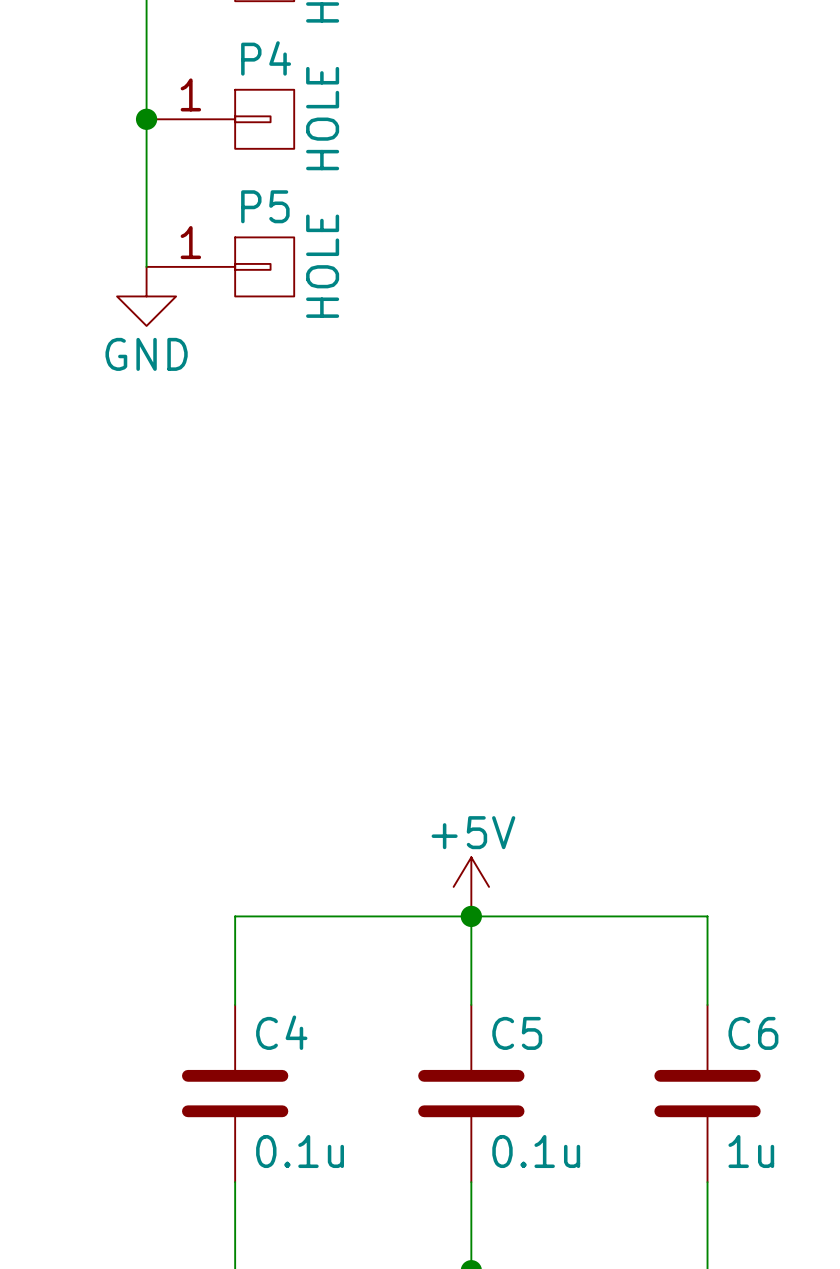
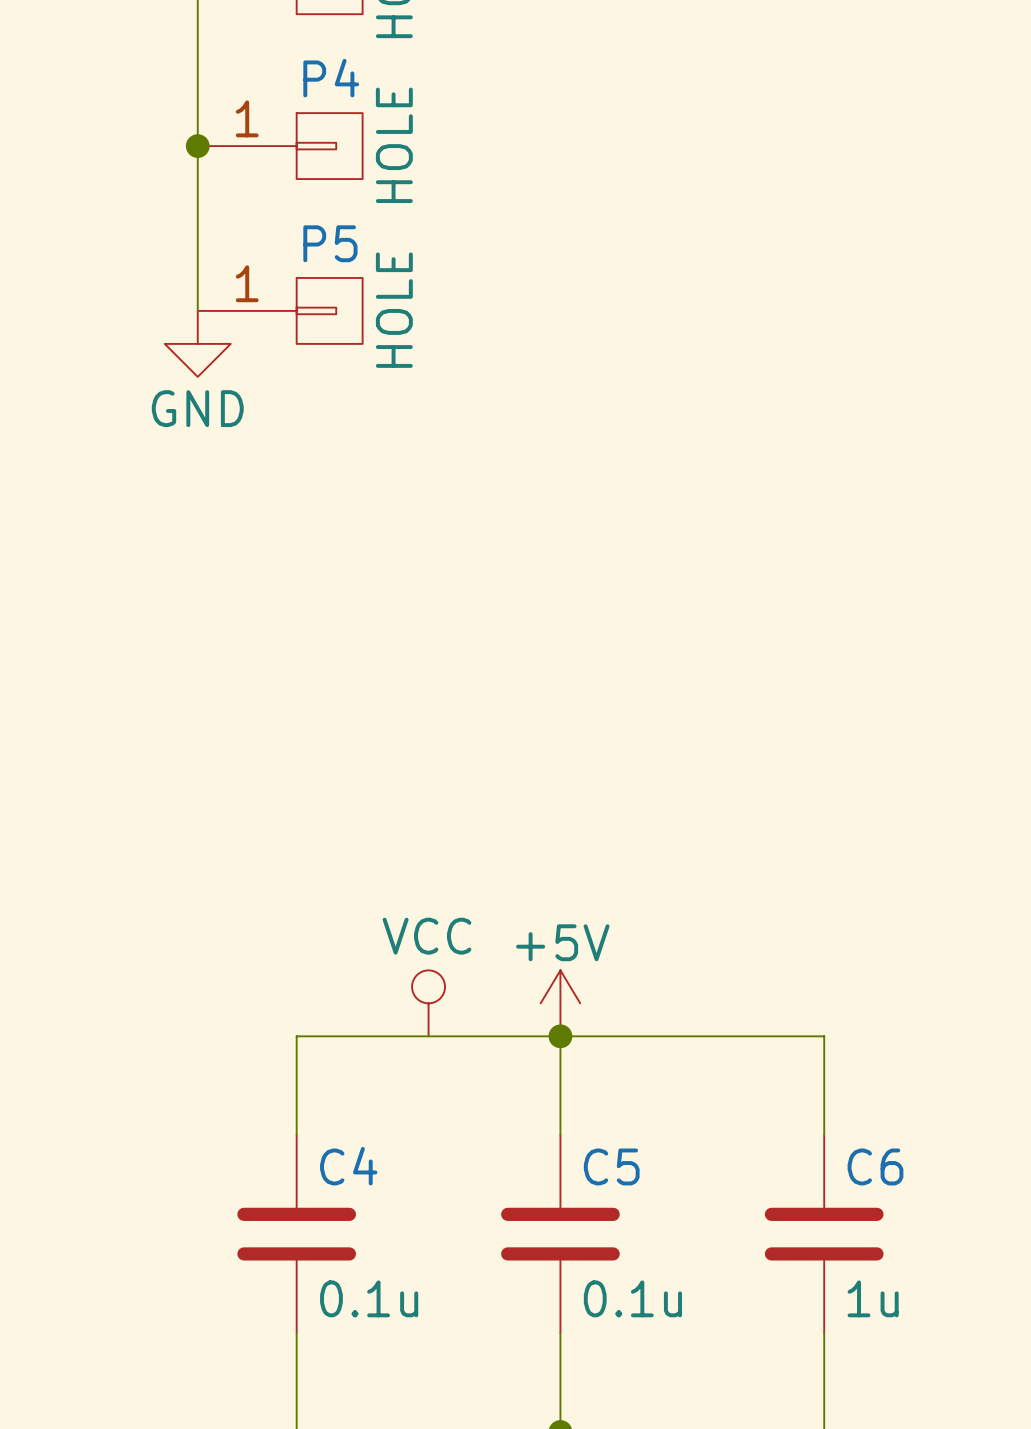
power symbol: none -> VCC (428, 1003)

